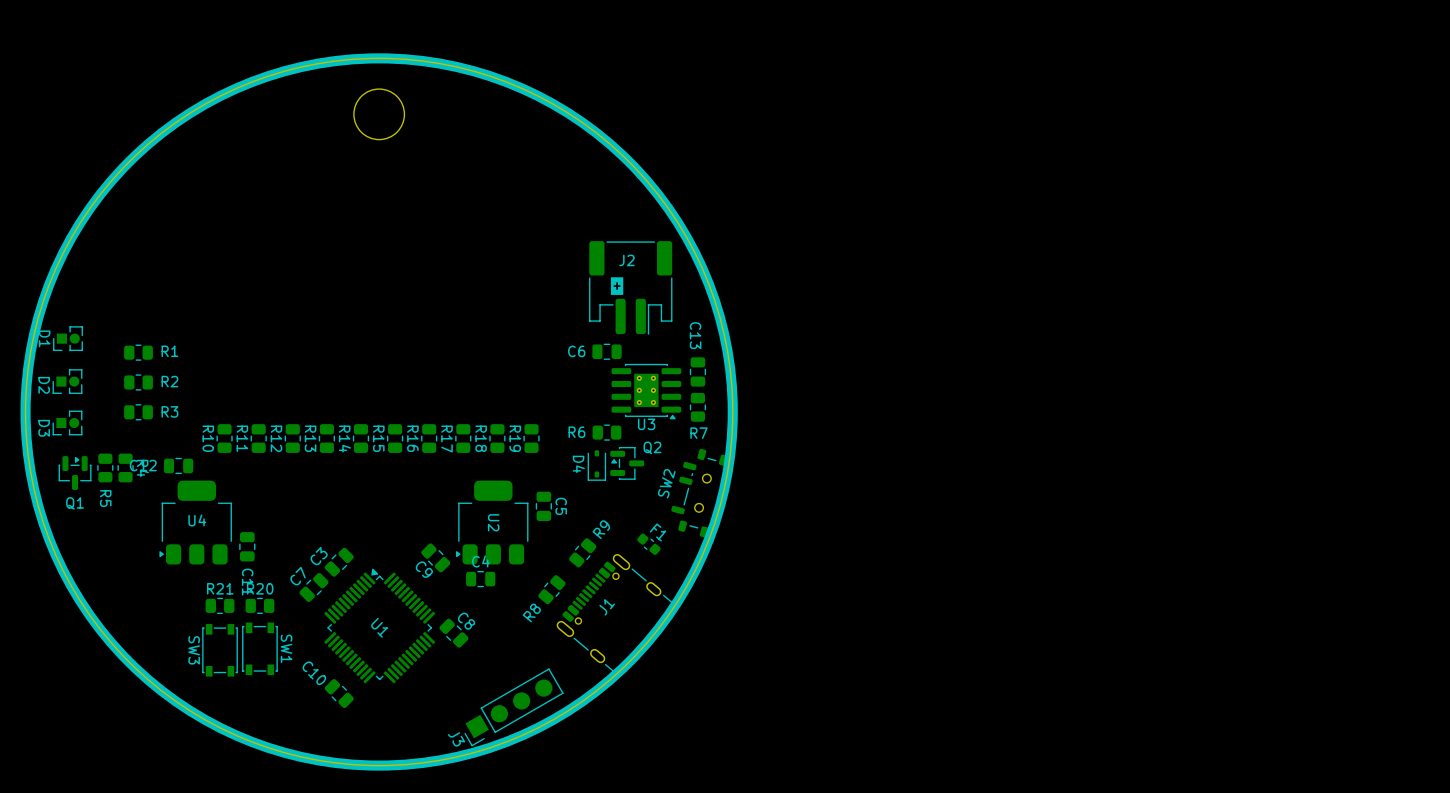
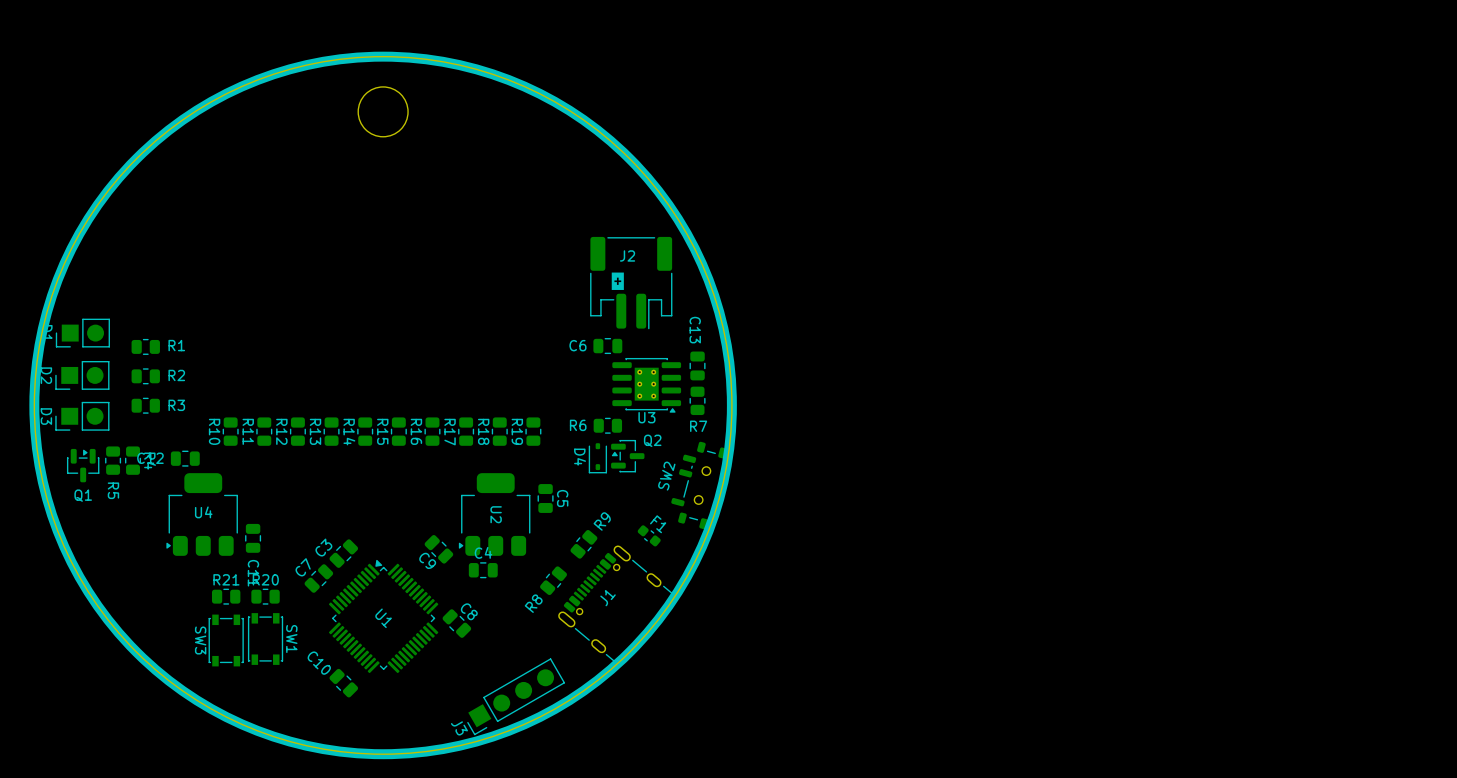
D1 footprint: [53, 326, 83, 351] -> [55, 318, 110, 348]
D2 footprint: [52, 369, 83, 394] -> [55, 361, 110, 390]
D3 footprint: [52, 410, 83, 436] -> [55, 401, 110, 431]

